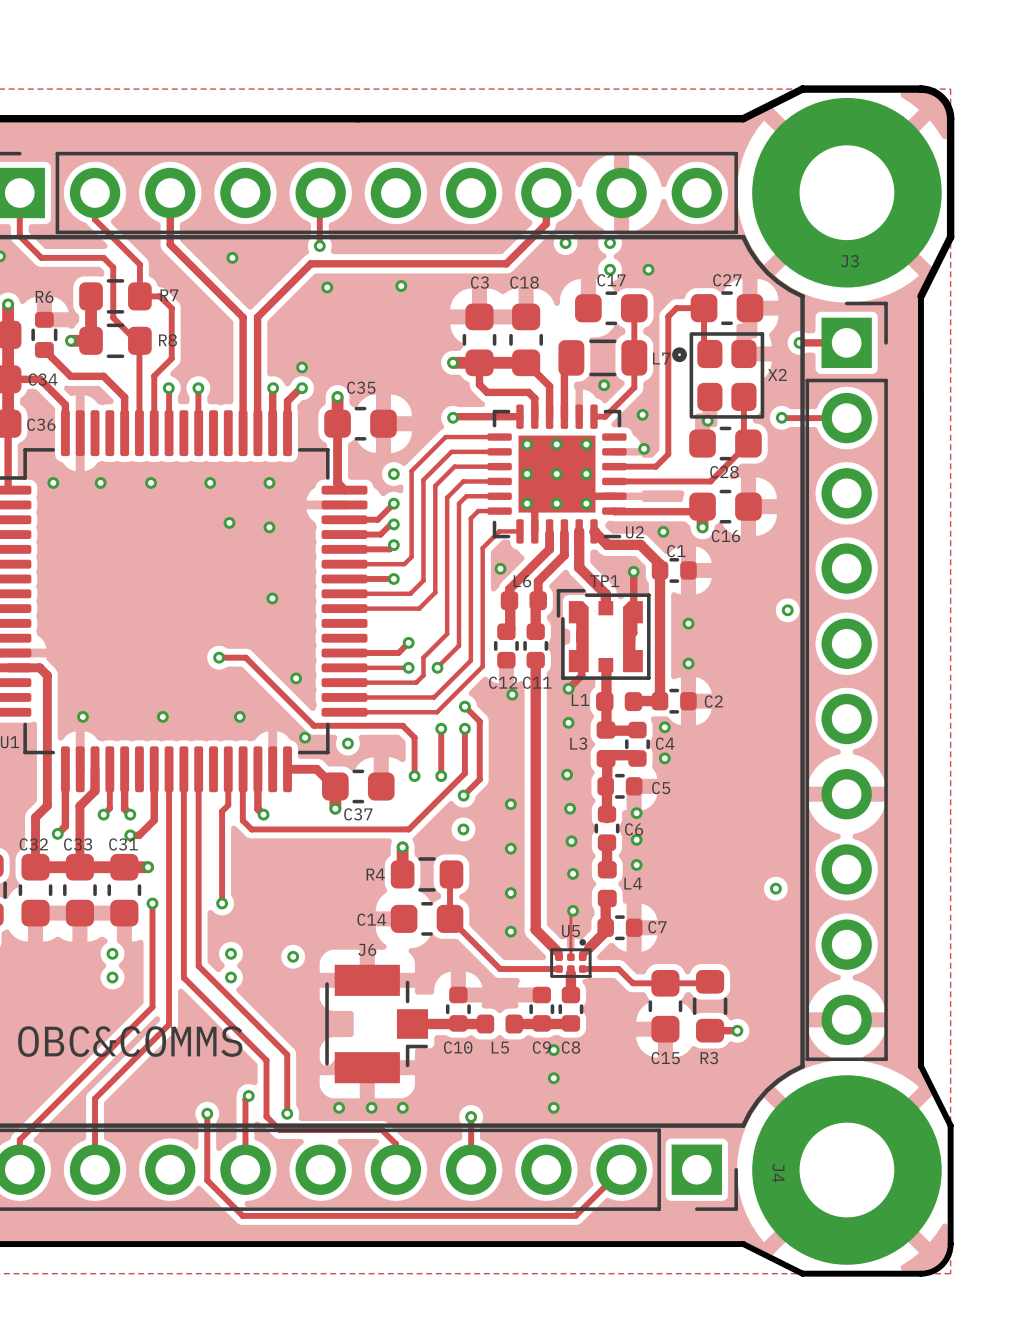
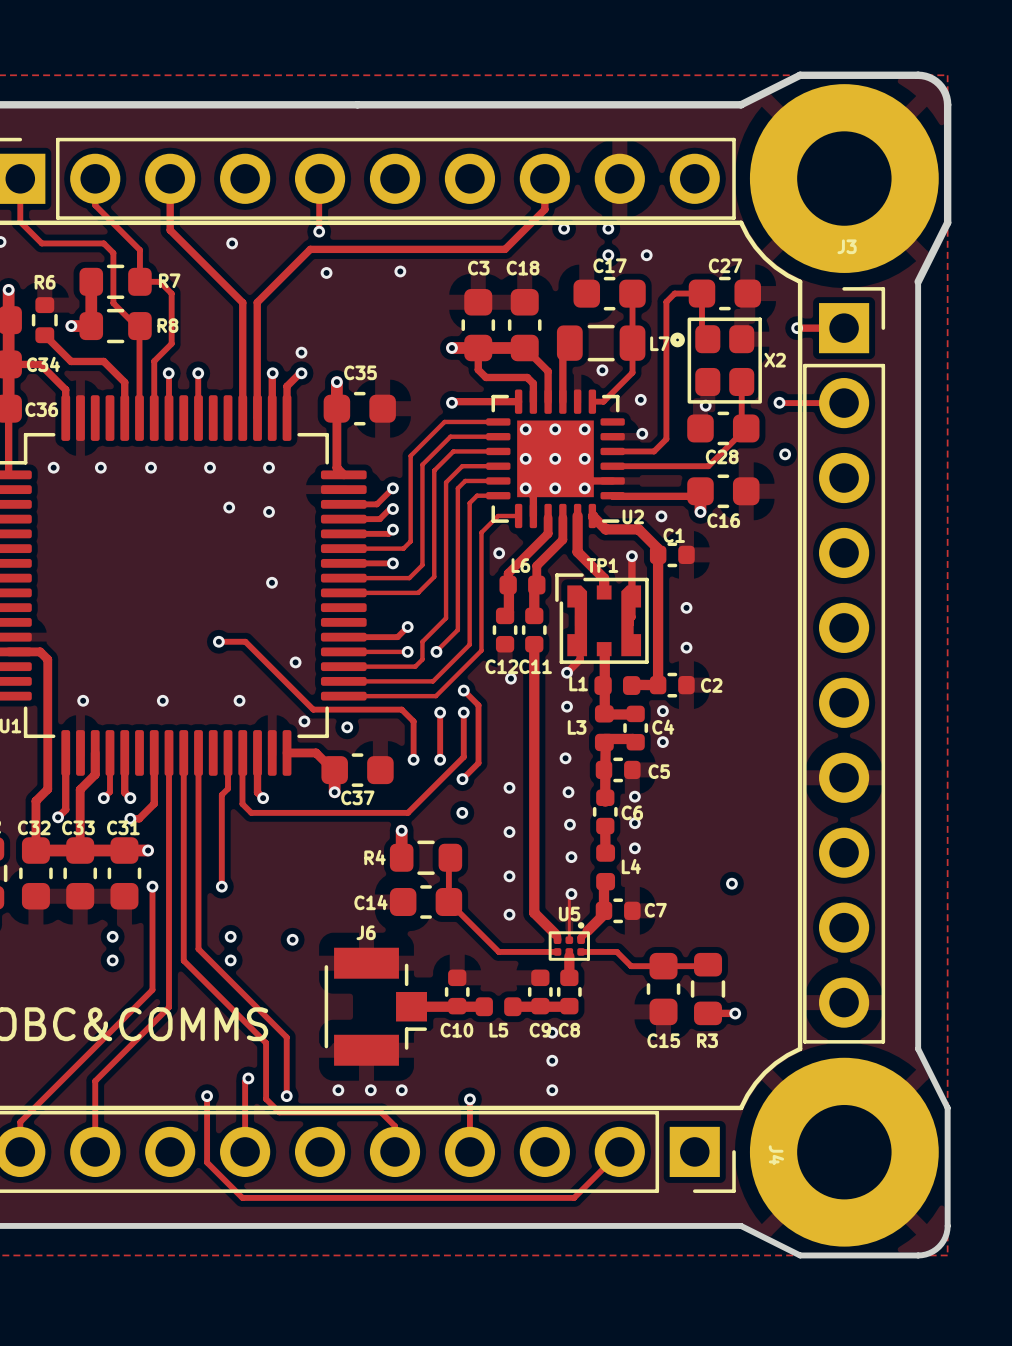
via: (393, 474) -> none
via position: (787, 610) -> (785, 454)
via position: (775, 888) -> (731, 883)

